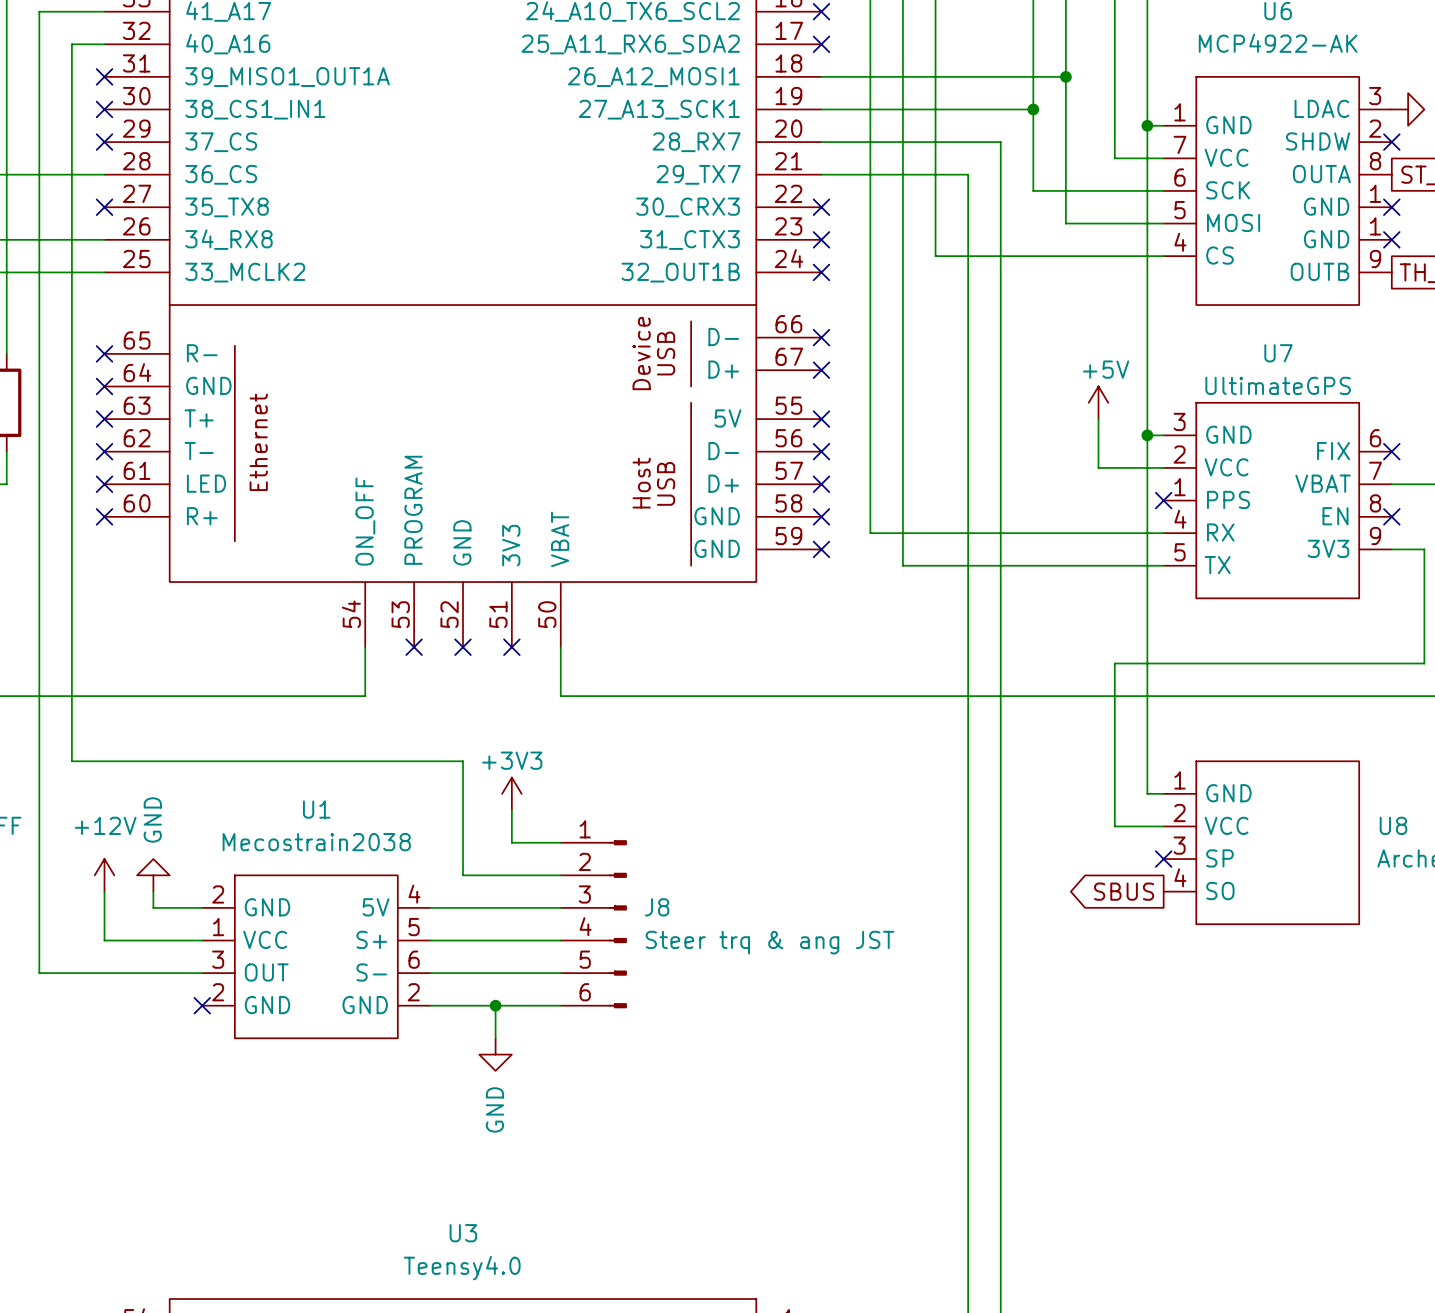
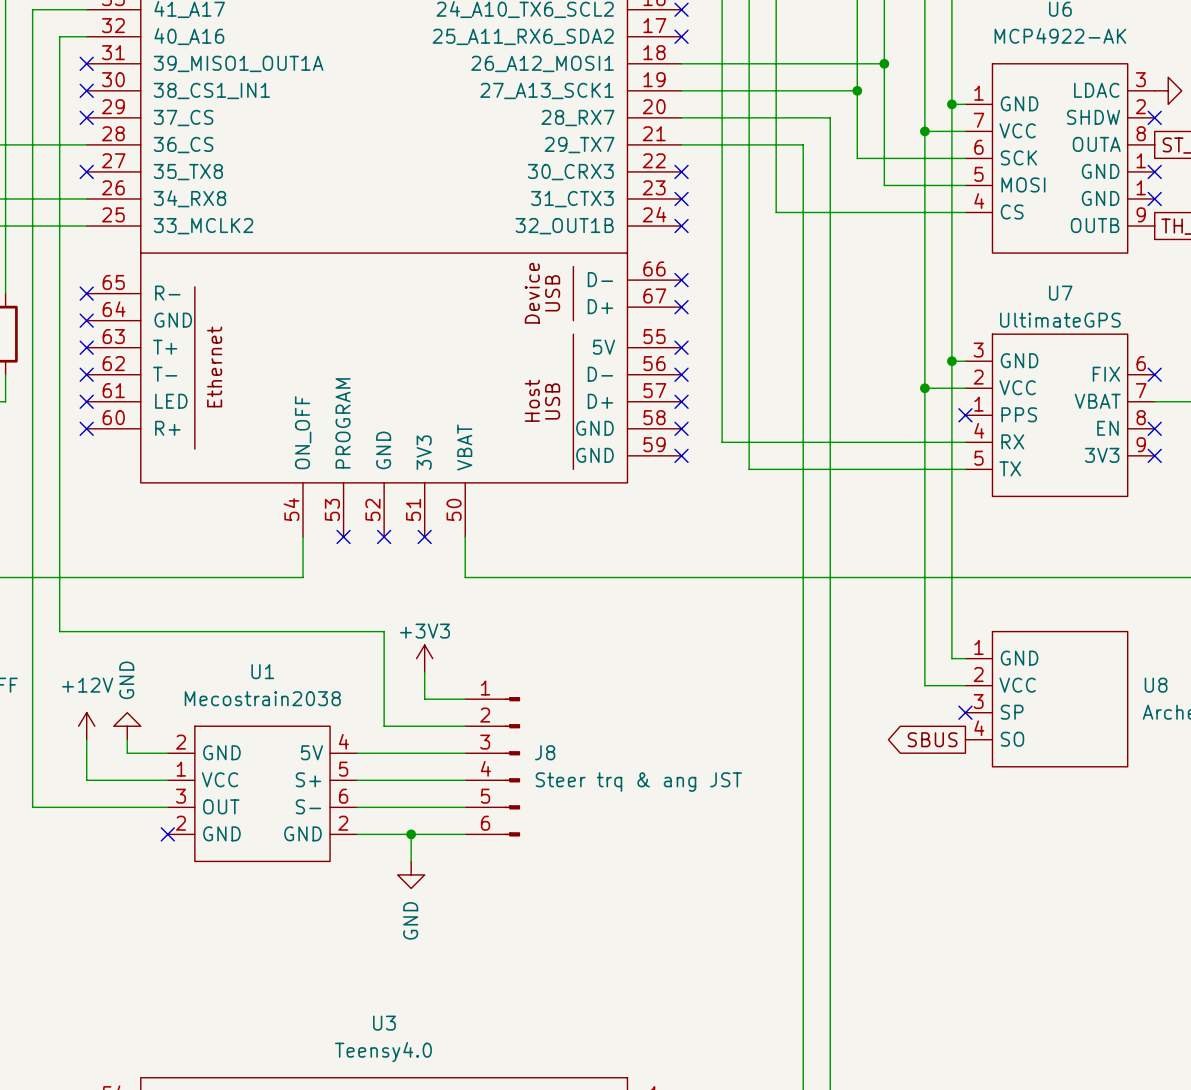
junction: none -> (924, 131)
power symbol: +5V (1098, 402) -> none
wire: (1098, 419) (1098, 467) (1114, 467) -> none
junction: none -> (924, 388)
wire: (1391, 549) (1424, 549) (1424, 663) (1114, 663) -> (924, 131) (924, 550)
no-connect mark: none -> (1154, 455)

